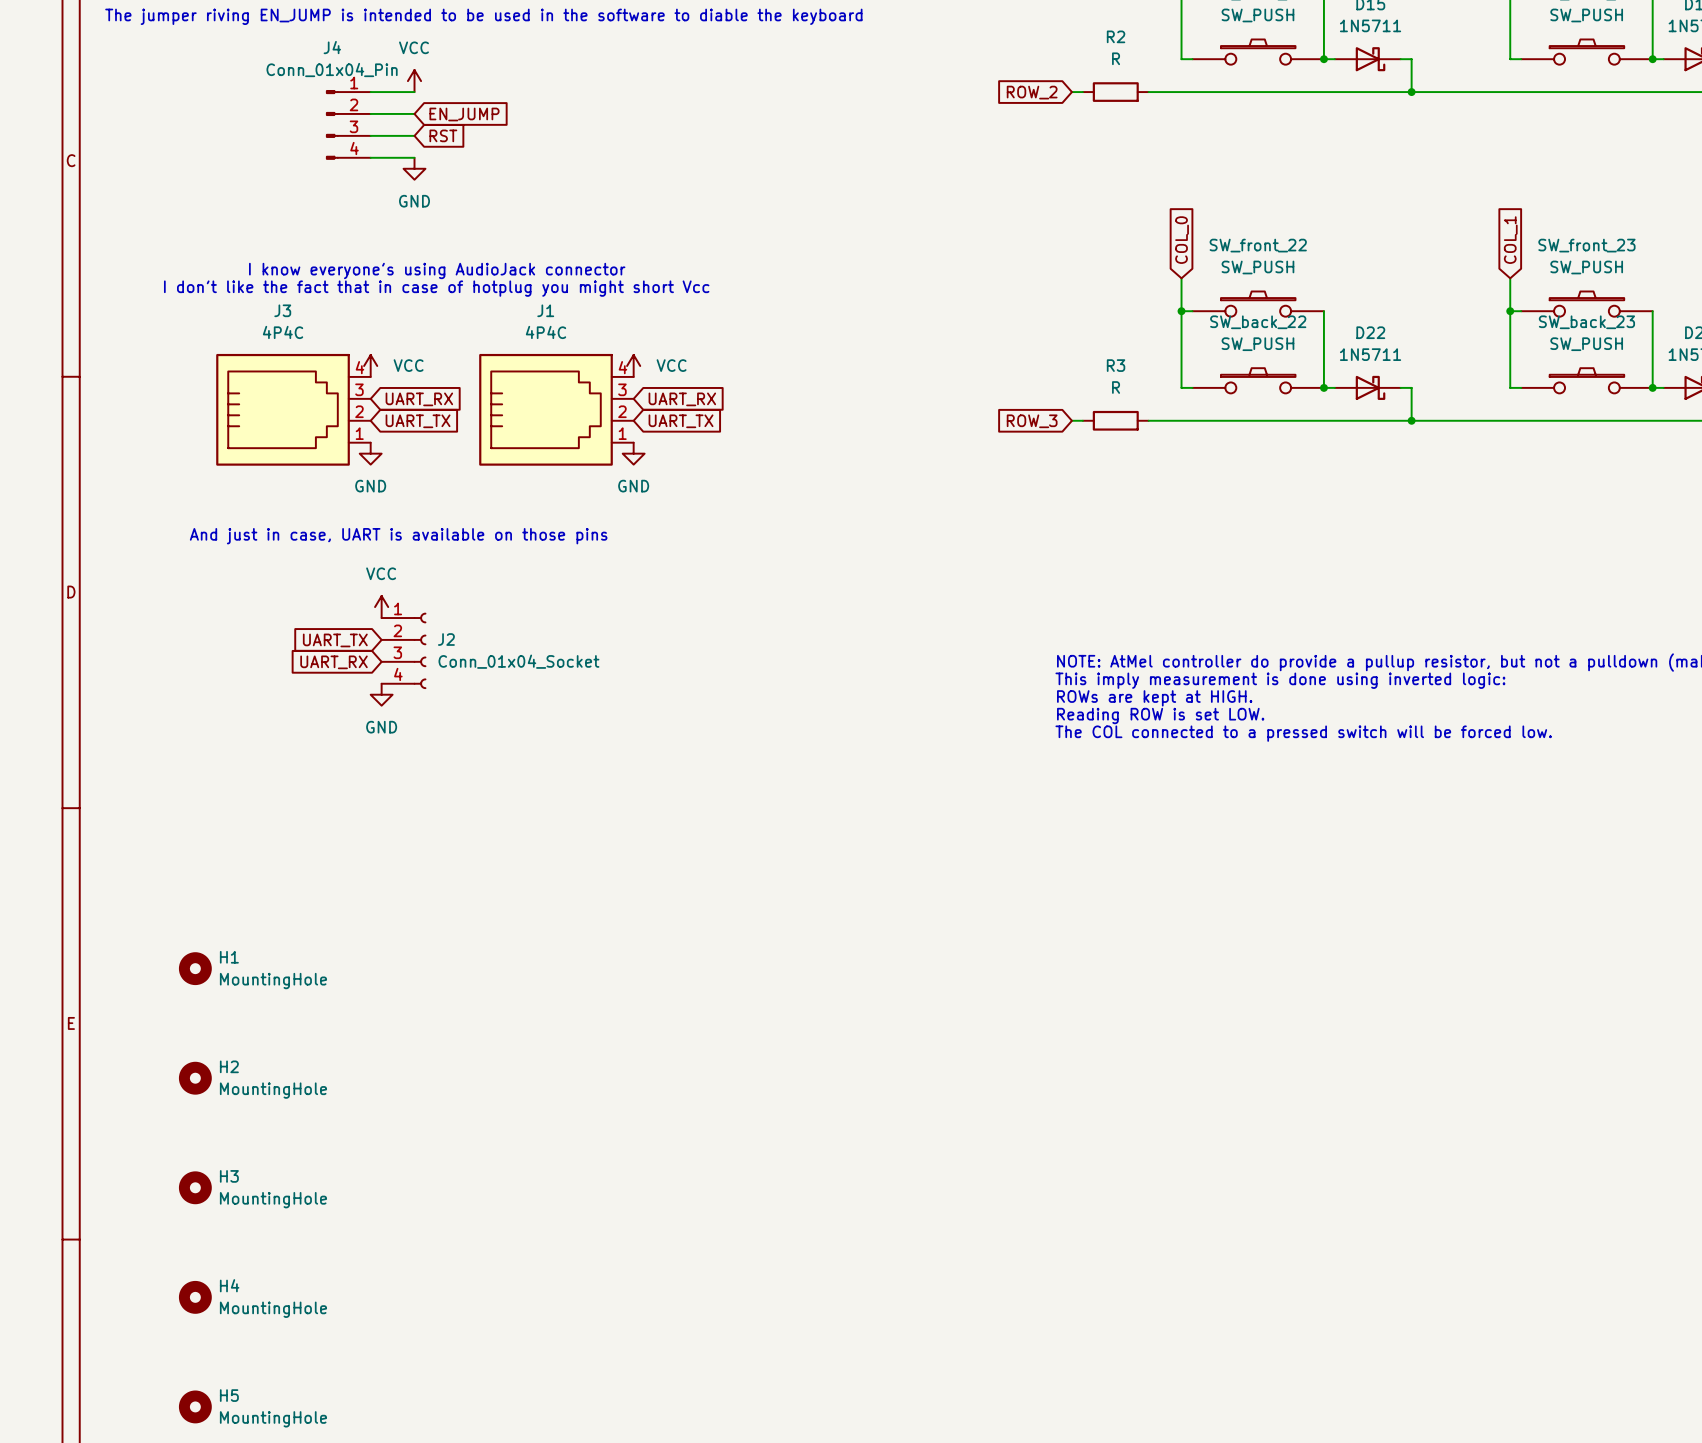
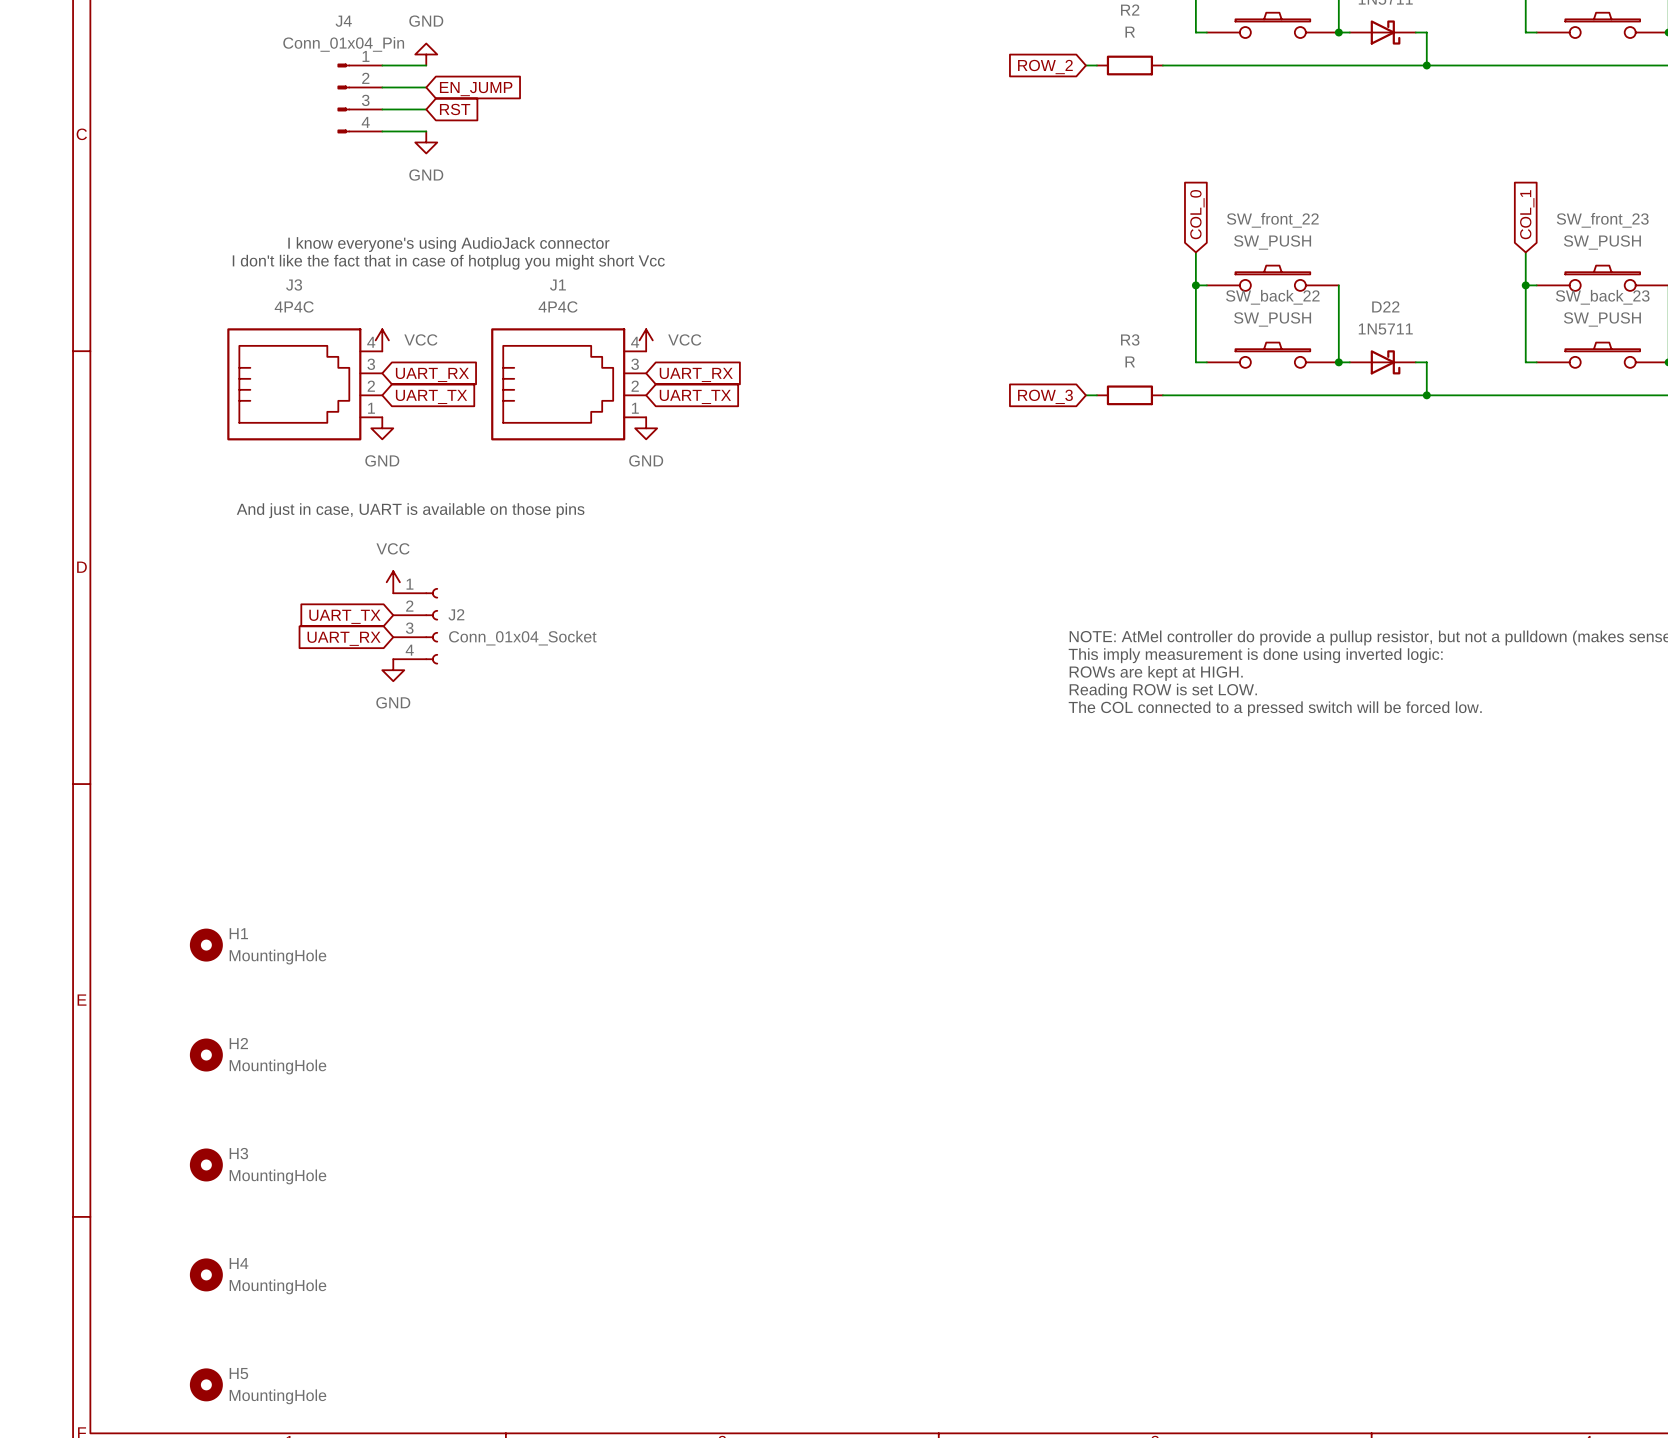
power symbol: VCC (414, 81) -> GND (426, 54)

